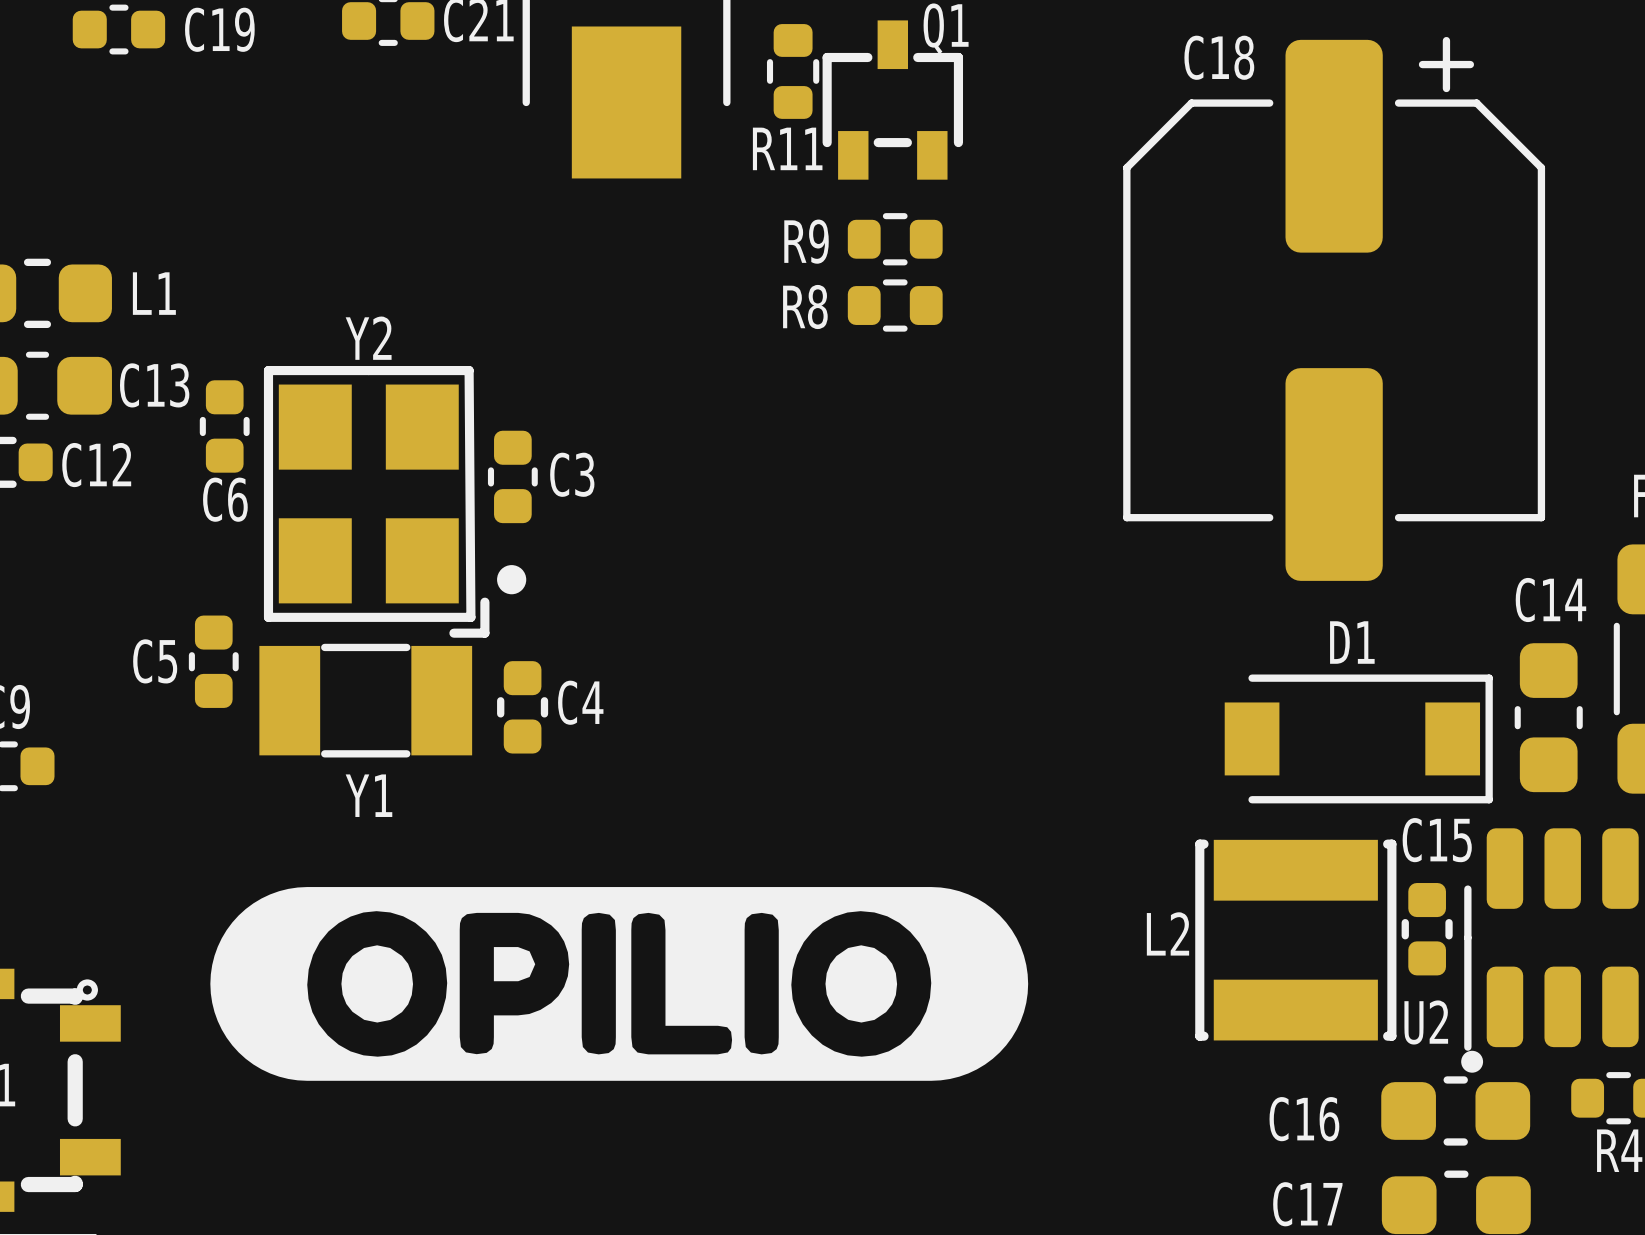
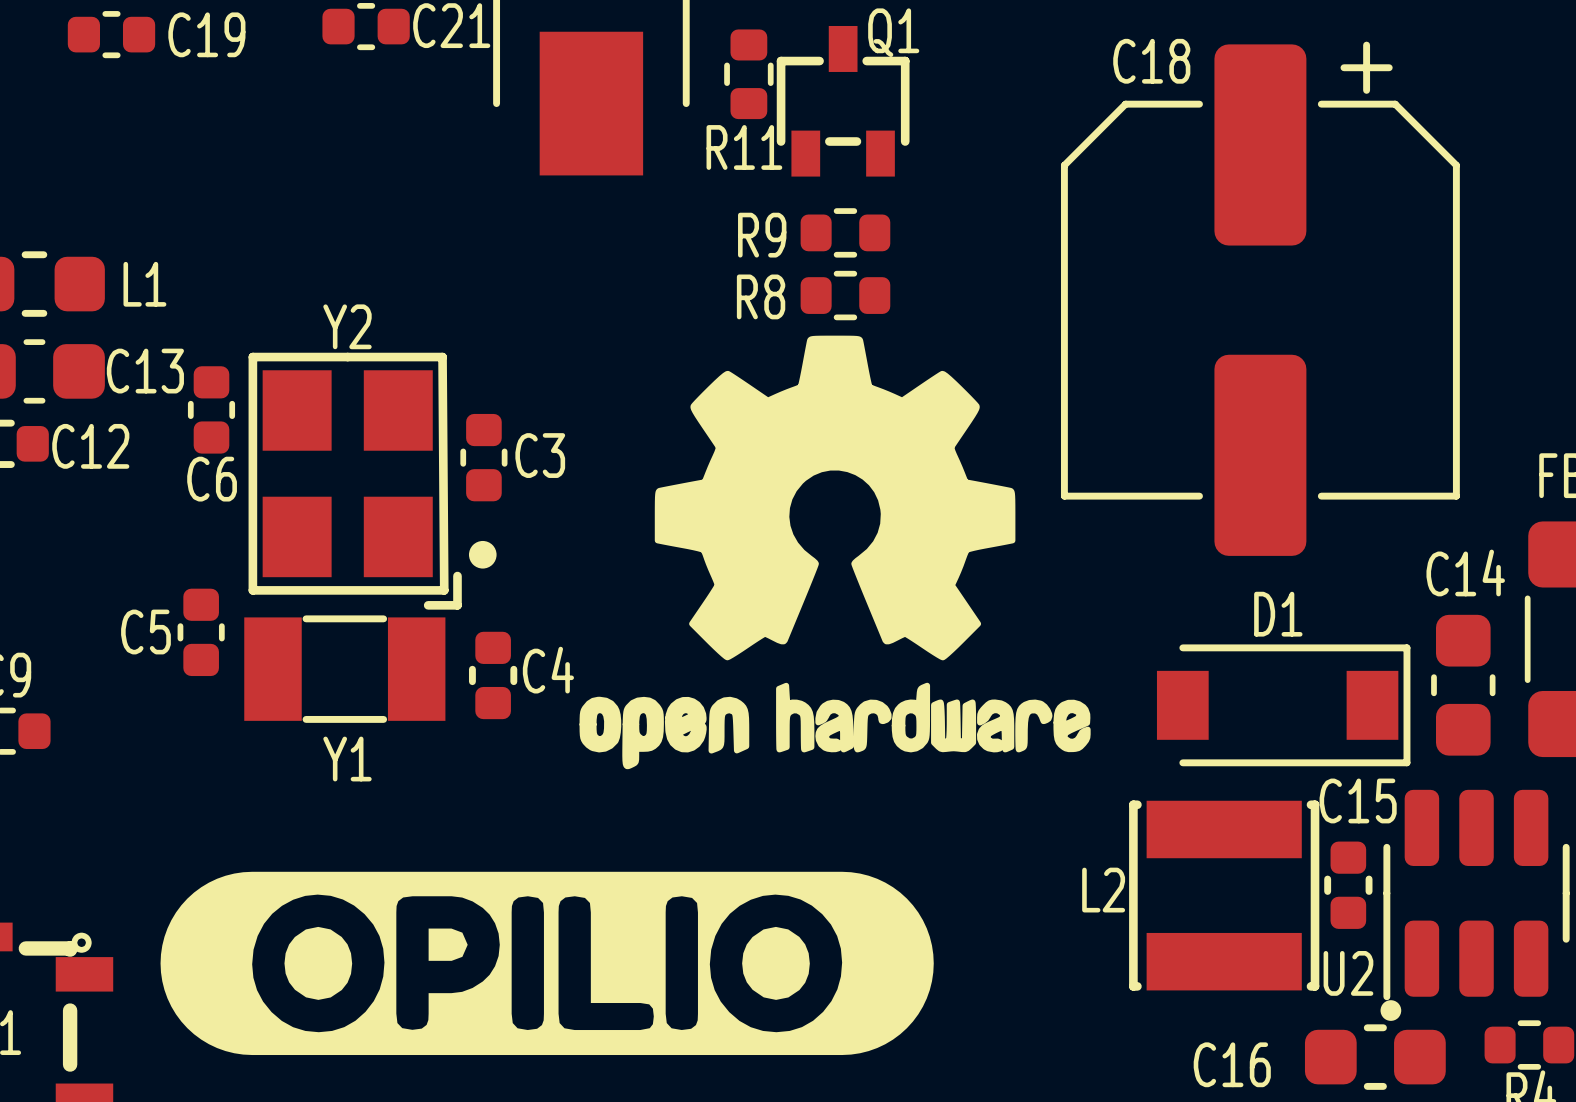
drawing: none -> [579, 335, 1091, 770]
drawing position: (619, 983) -> (547, 963)

